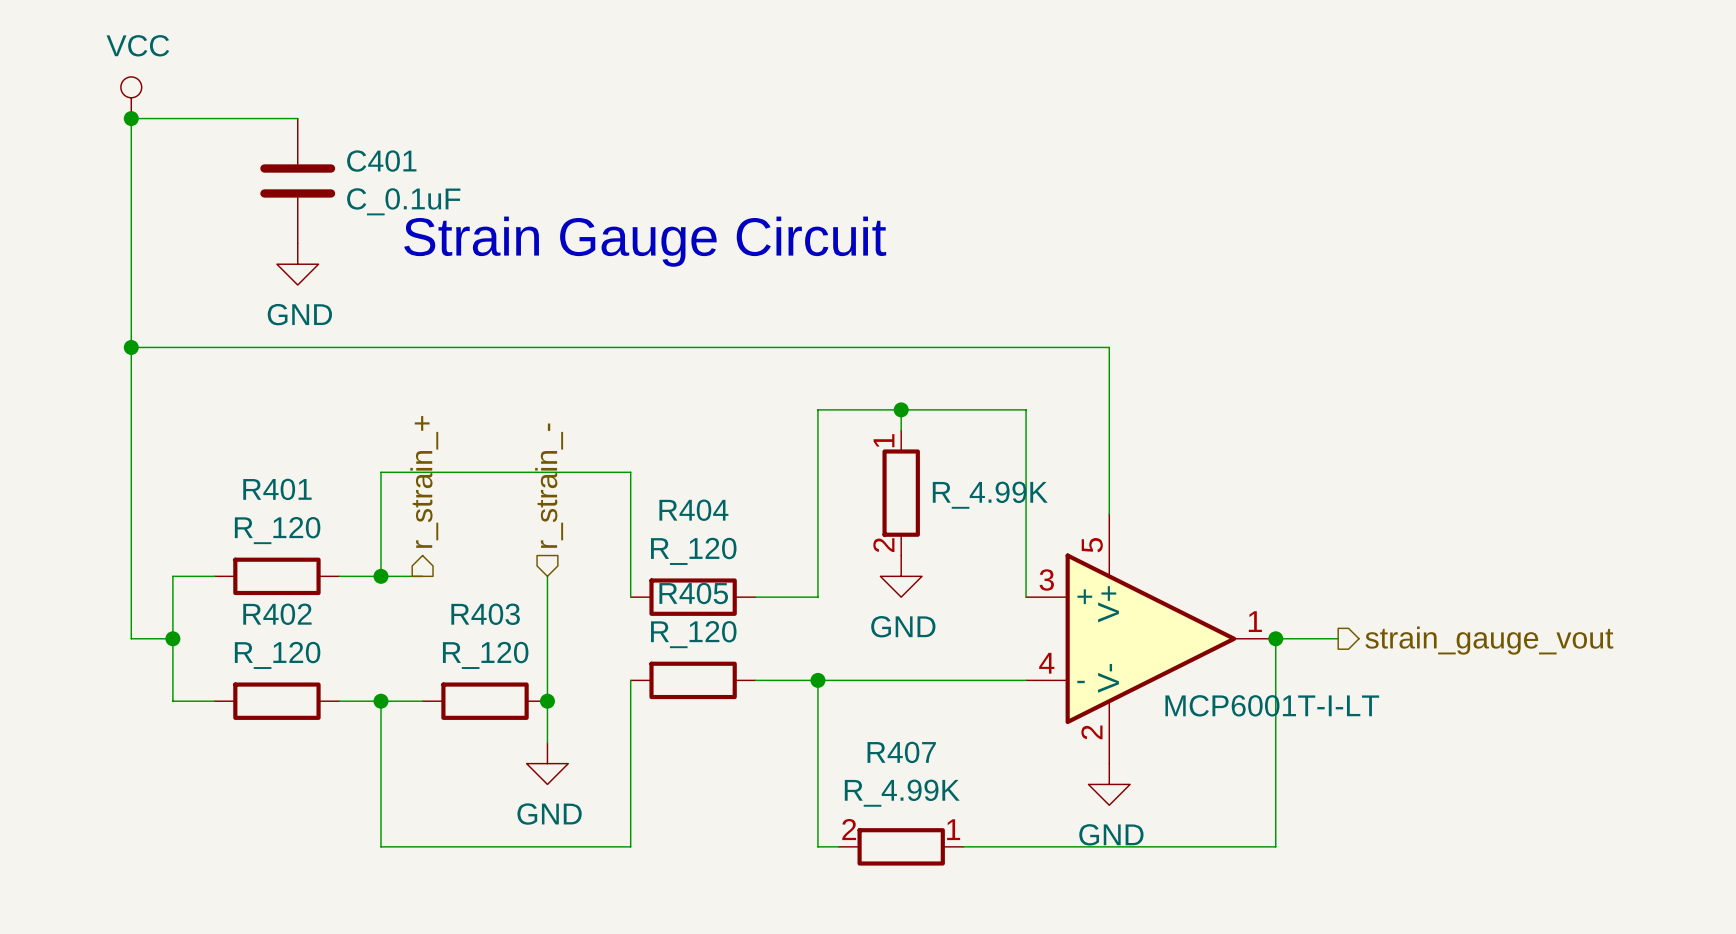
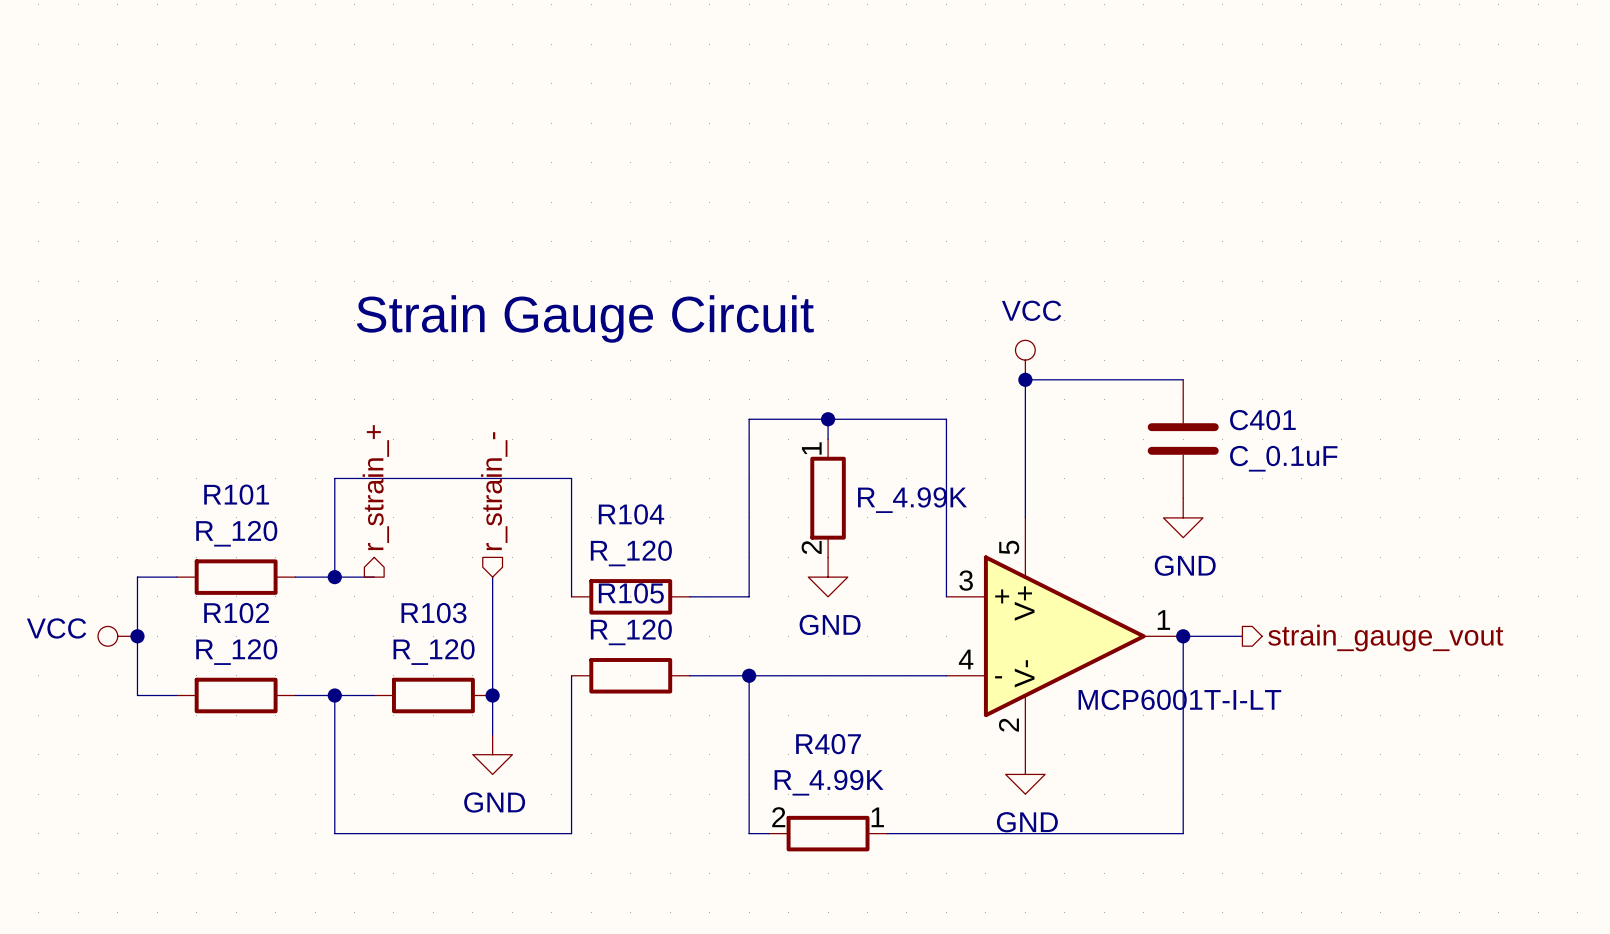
power symbol: VCC (131, 97) -> none
junction: (131, 118) -> none
wire: (297, 118) (131, 118) (131, 638) (172, 638) -> none
C401 position: (297, 180) -> (1183, 439)
text position: Strain Gauge Circuit (645, 241) -> Strain Gauge Circuit (585, 318)
power symbol: GND (297, 264) -> none
wire: (131, 347) (1109, 347) (1109, 368) -> (1183, 379) (1025, 379)
junction: (131, 347) -> none
power symbol: none -> VCC (1025, 360)
junction: none -> (1025, 379)
R401 name: R401 (277, 489) -> R101 (236, 494)
R404 name: R404 (693, 510) -> R104 (631, 514)
power symbol: none -> GND (1183, 517)
R405 name: R405 (693, 593) -> R105 (631, 593)
R402 name: R402 (277, 614) -> R102 (236, 613)
R403 name: R403 (485, 614) -> R103 (433, 613)
power symbol: none -> VCC (117, 636)

